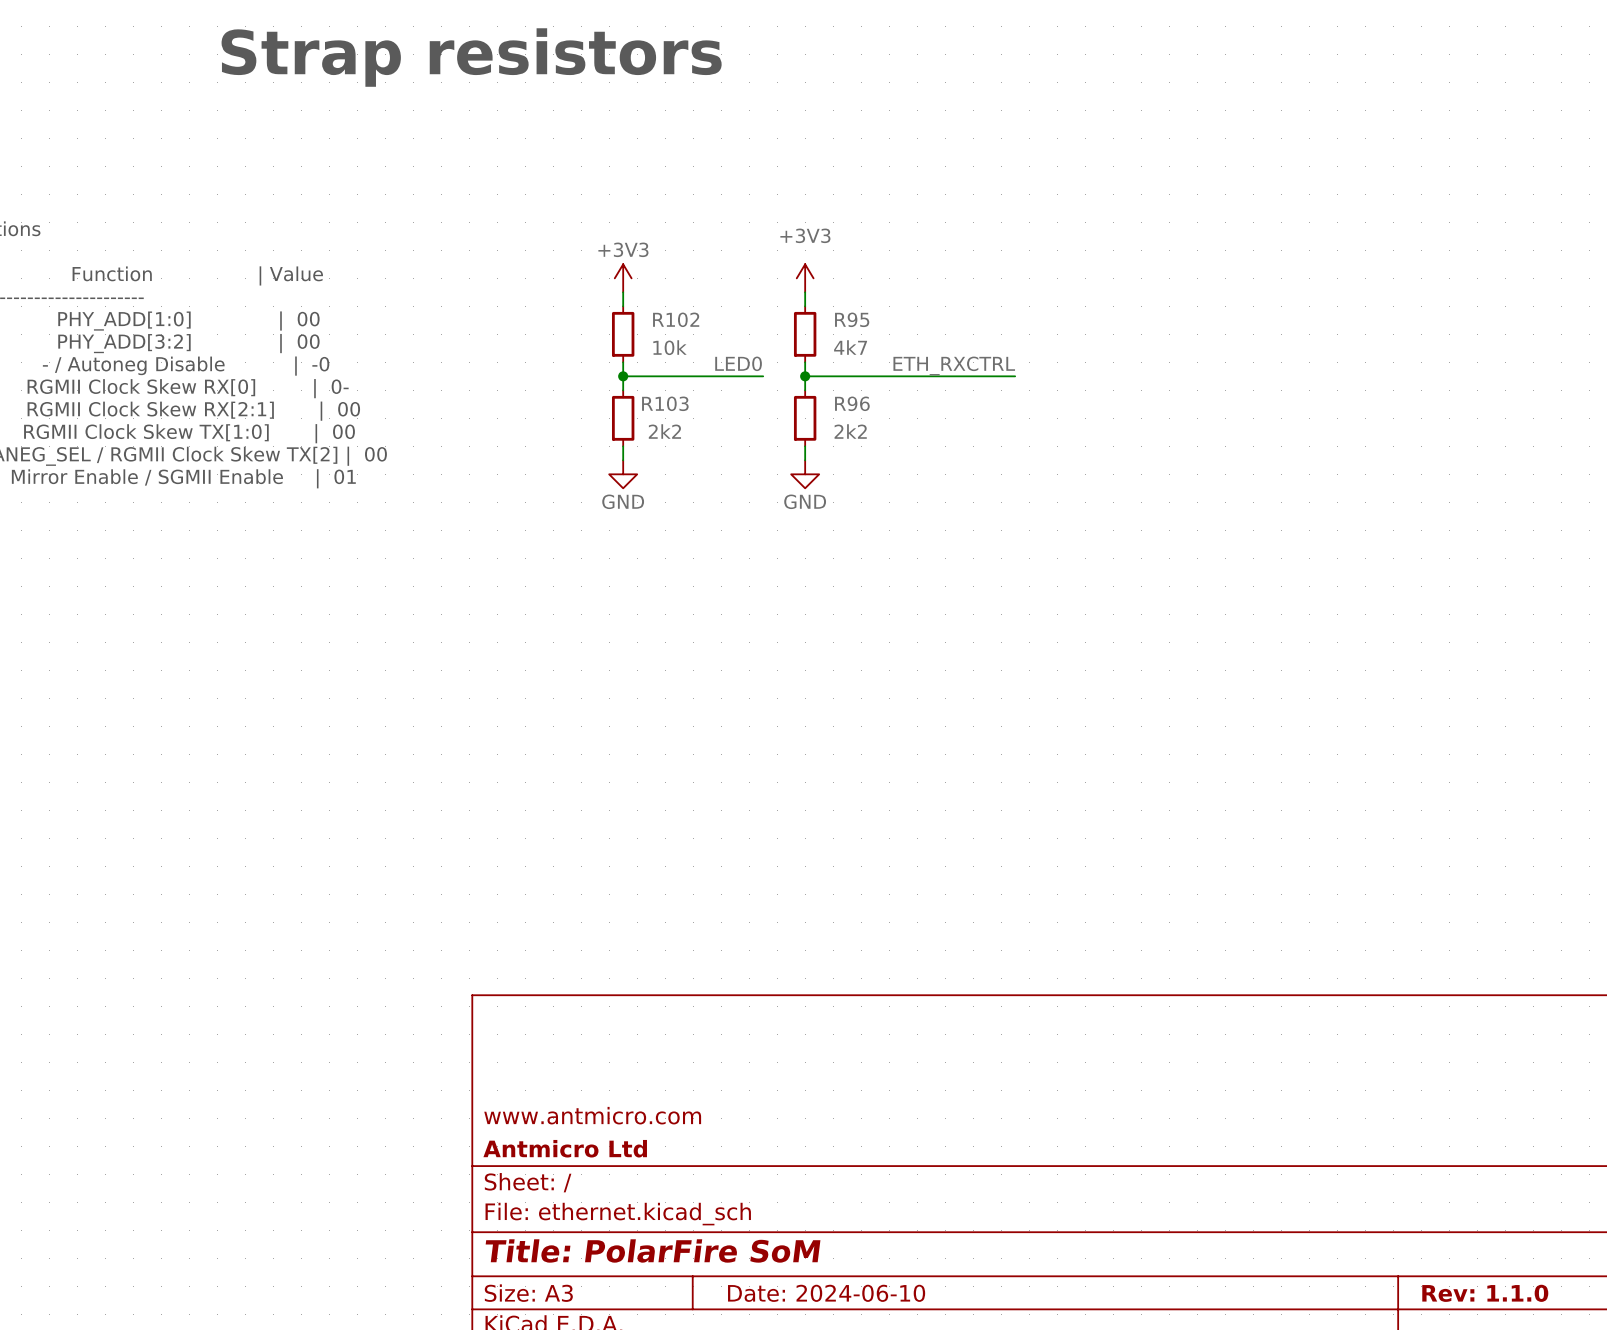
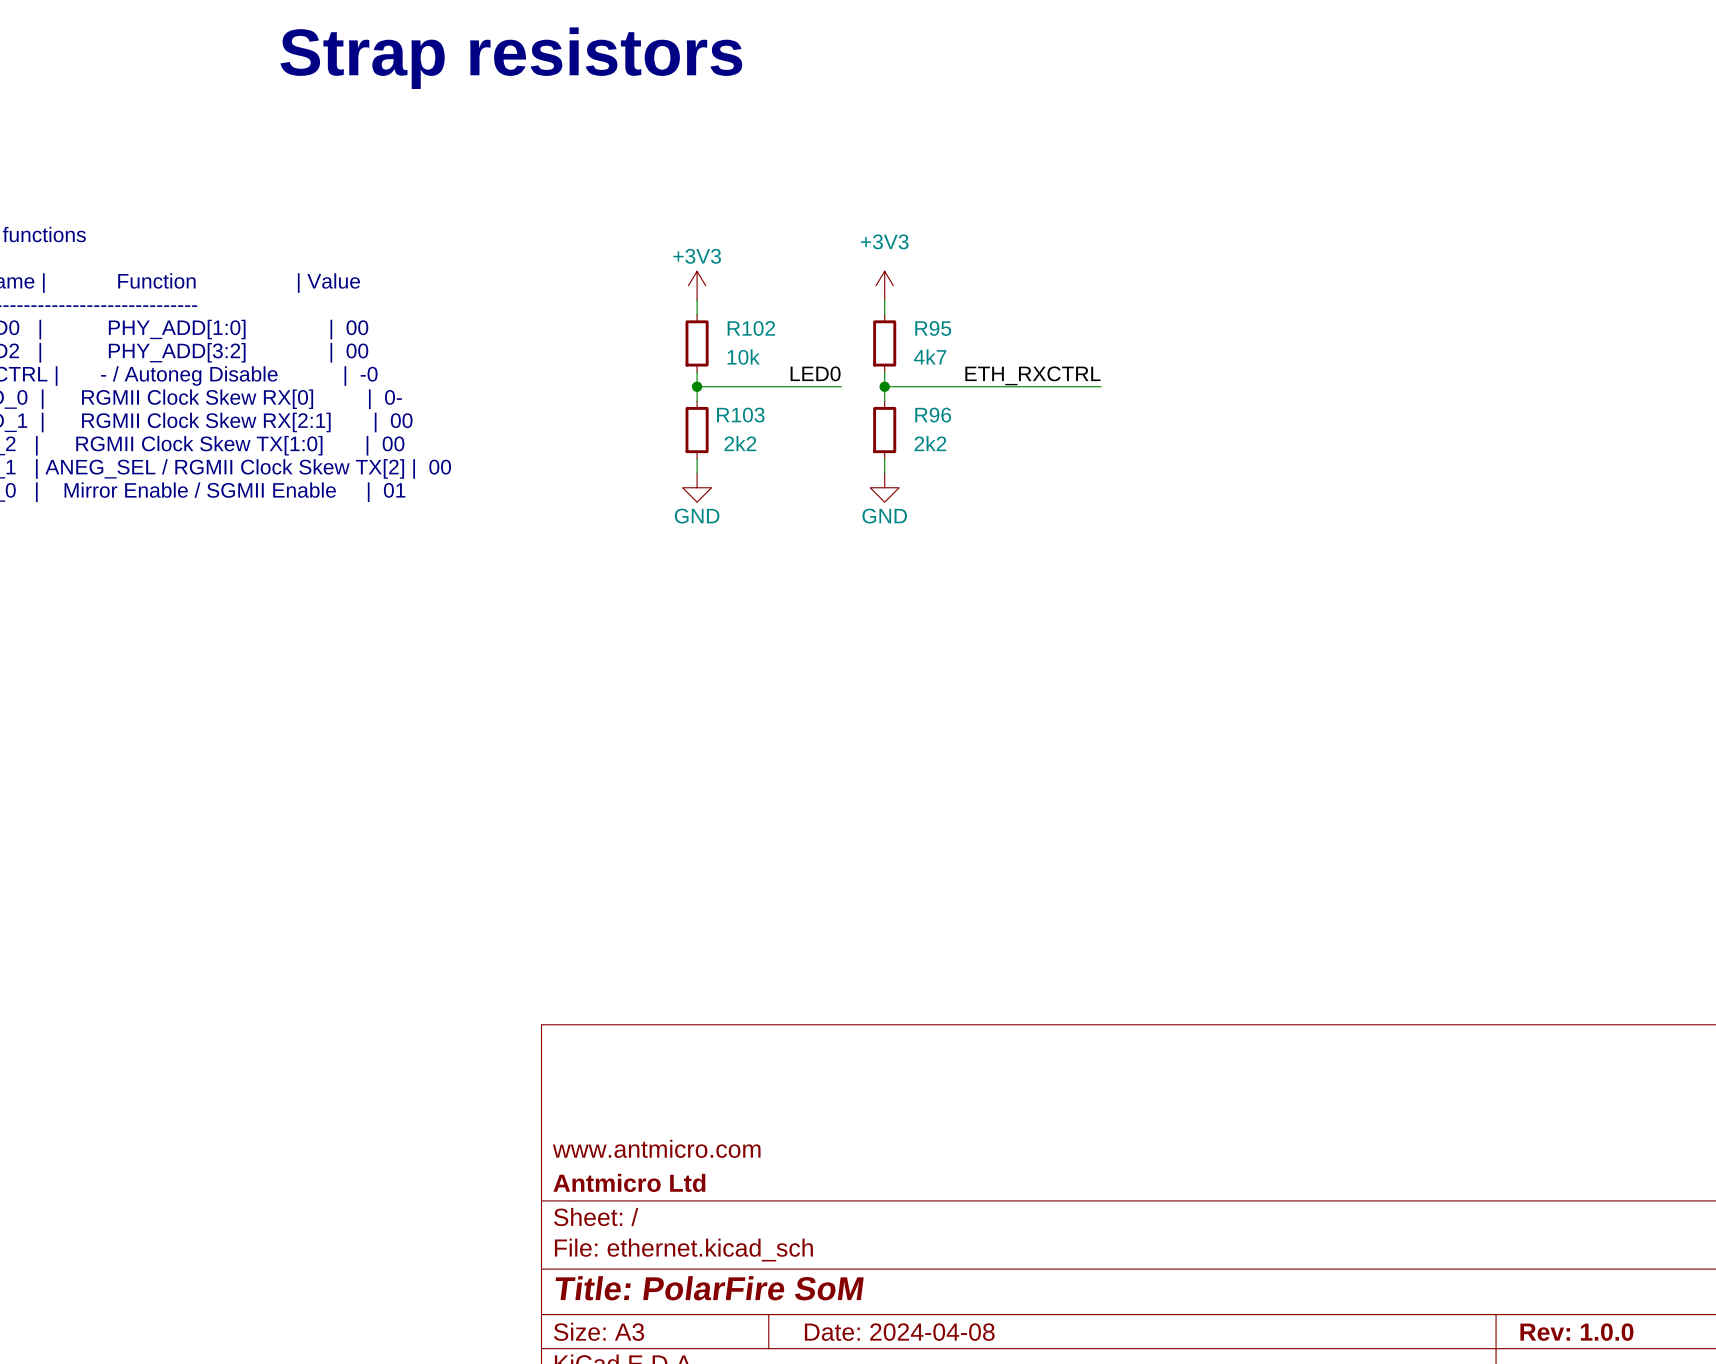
title block: Date: 2024-06-10 (826, 1293) -> Date: 2024-04-08 (899, 1332)
title block: Rev: 1.1.0 (1485, 1293) -> Rev: 1.0.0 (1576, 1332)

